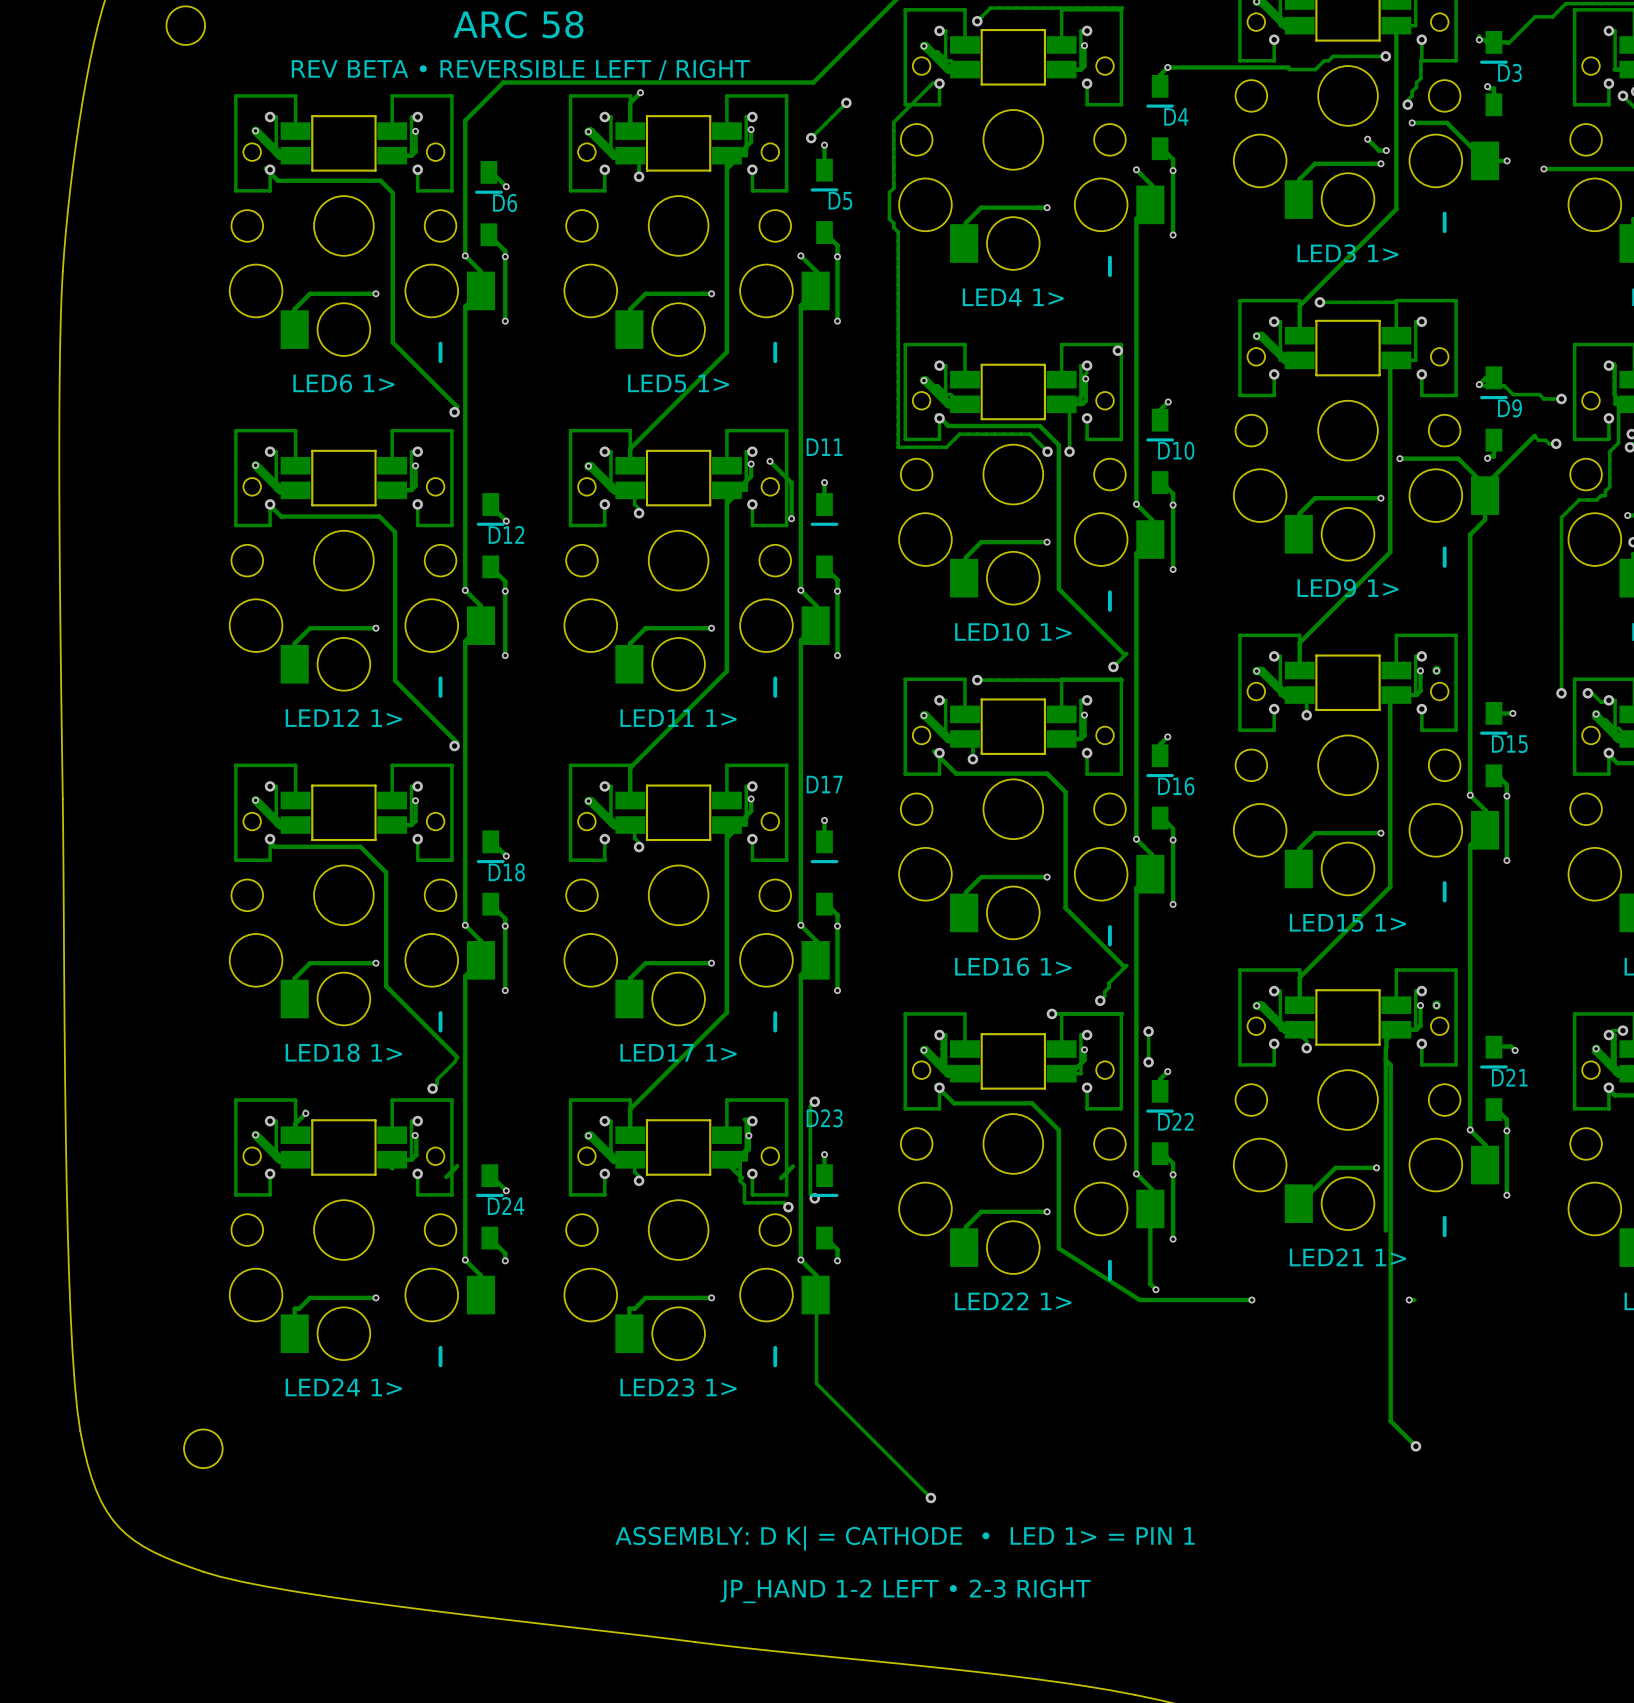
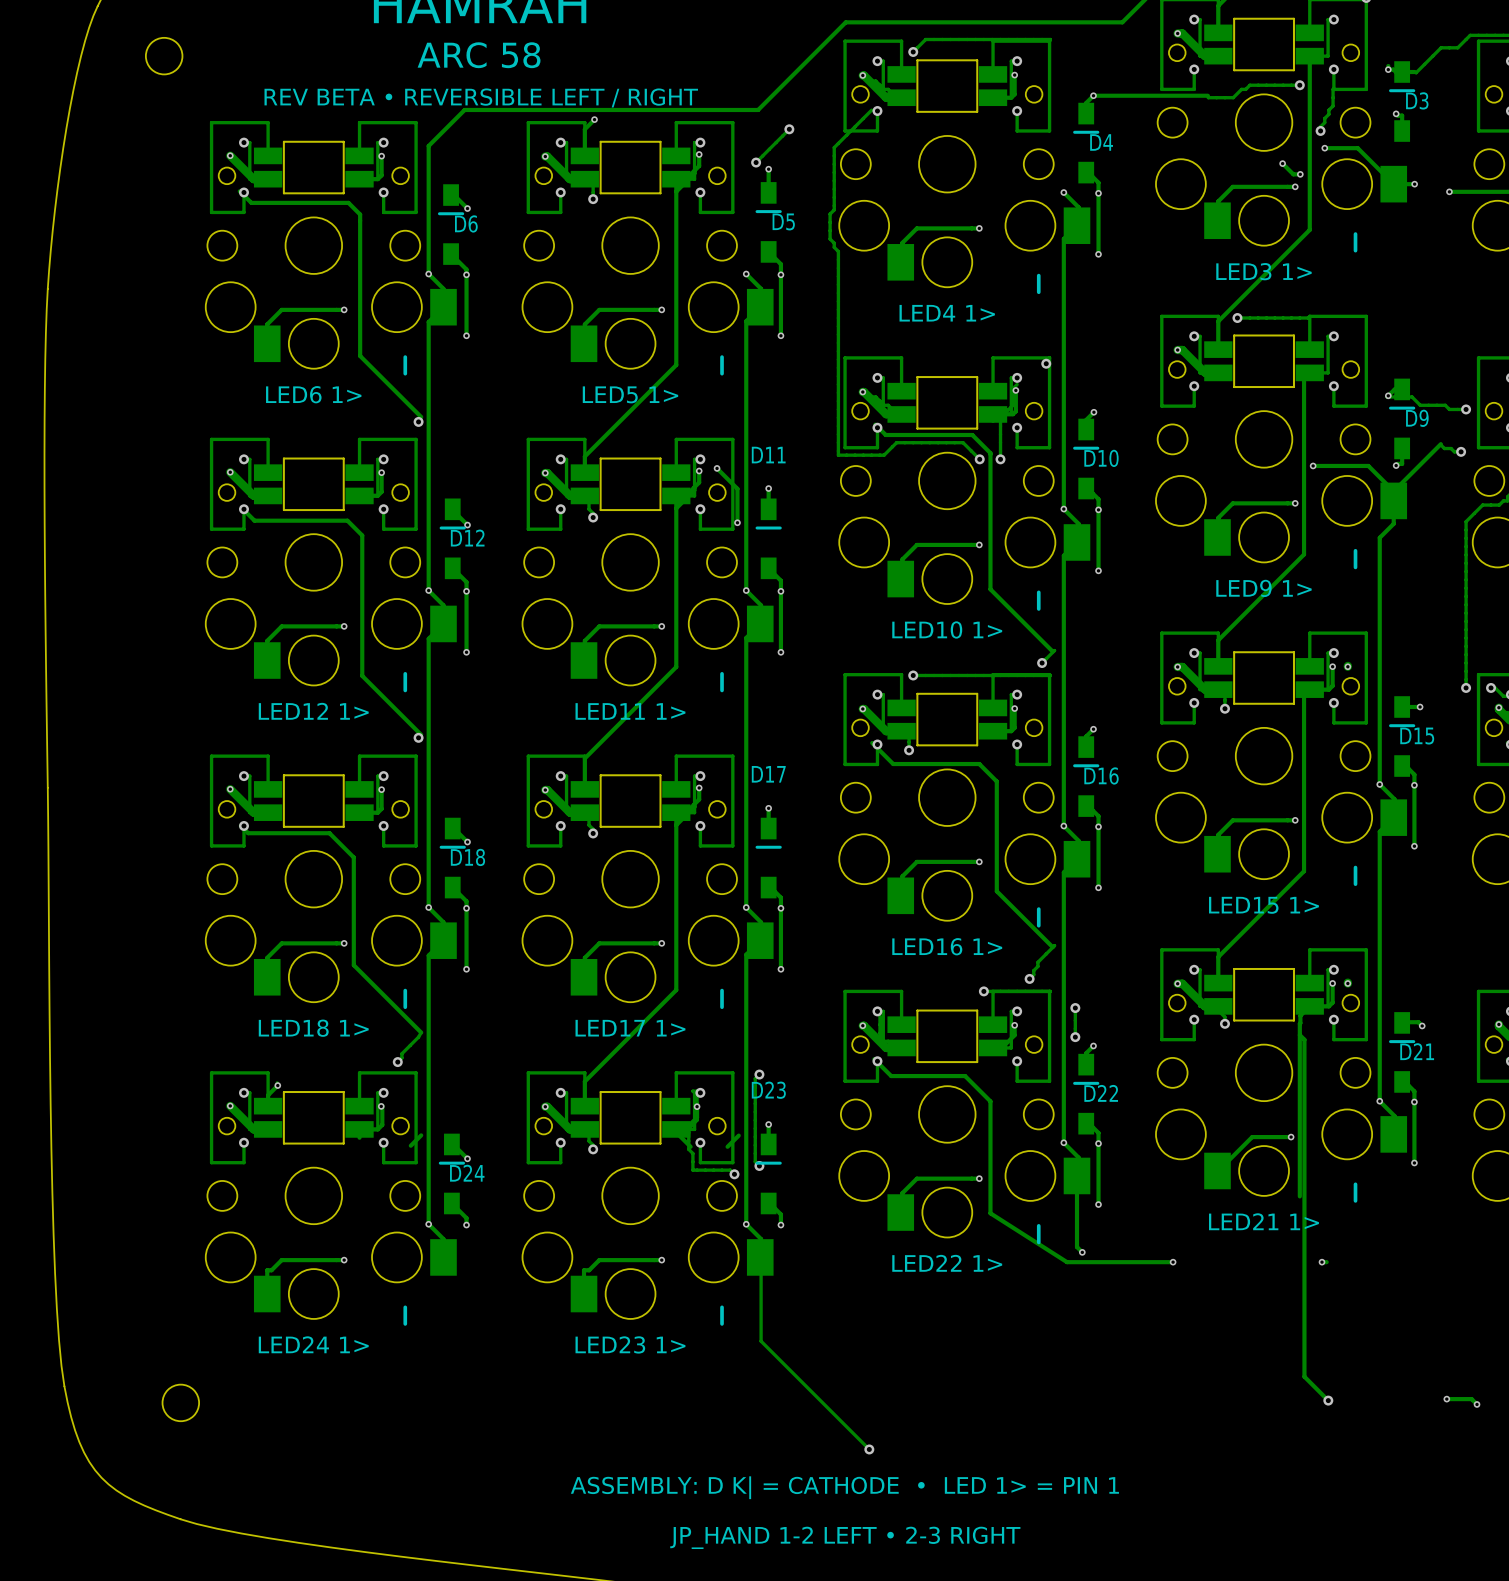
track: none -> (1446, 1399) (1471, 1399) (1477, 1404)
via: none -> (1446, 1399)
via: none -> (1477, 1404)

